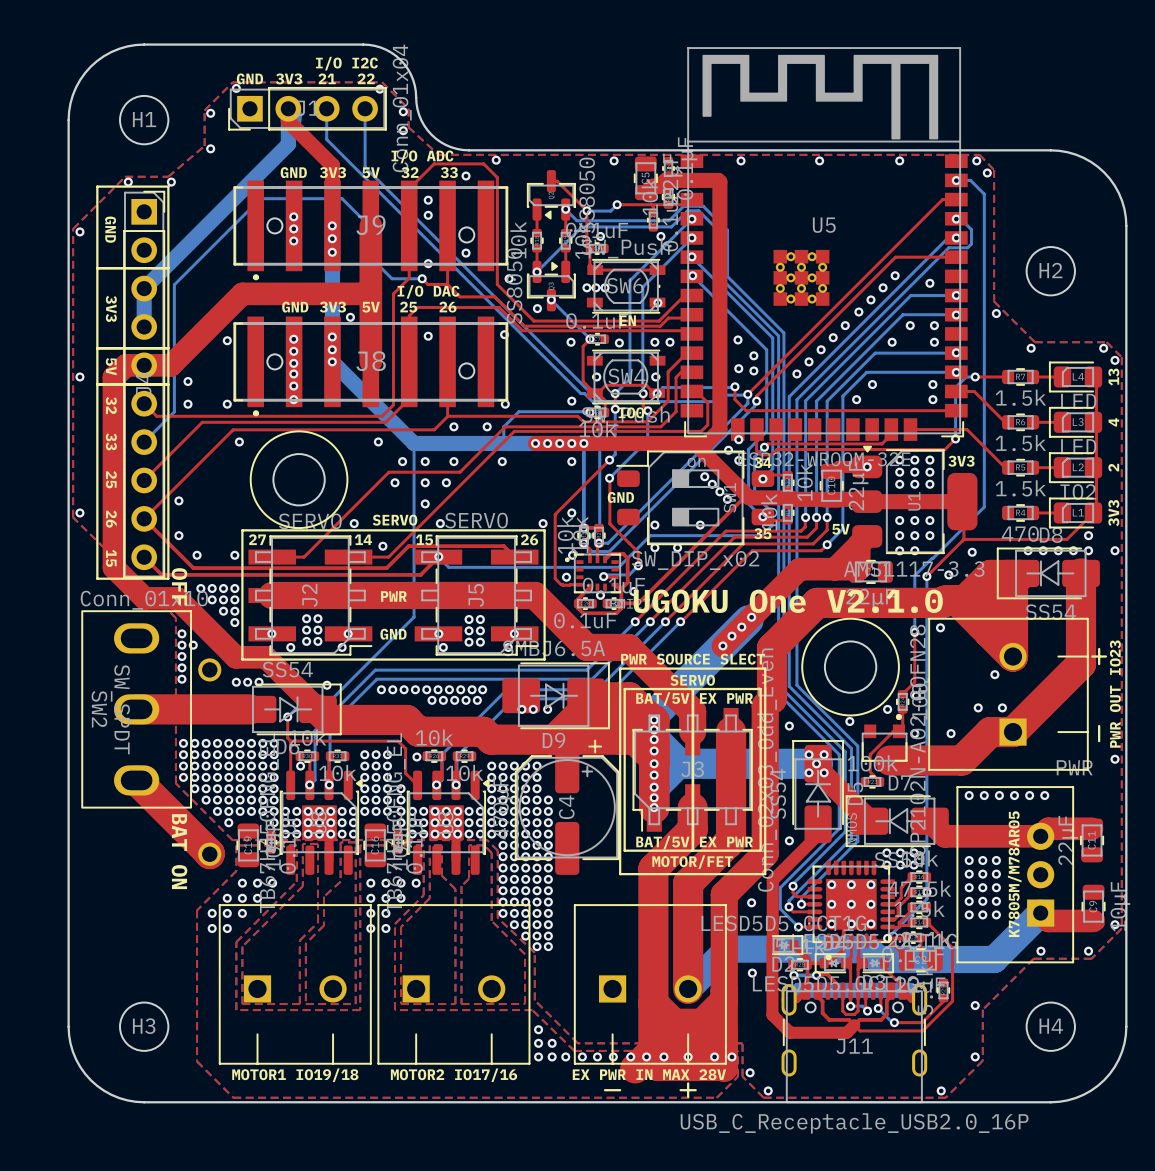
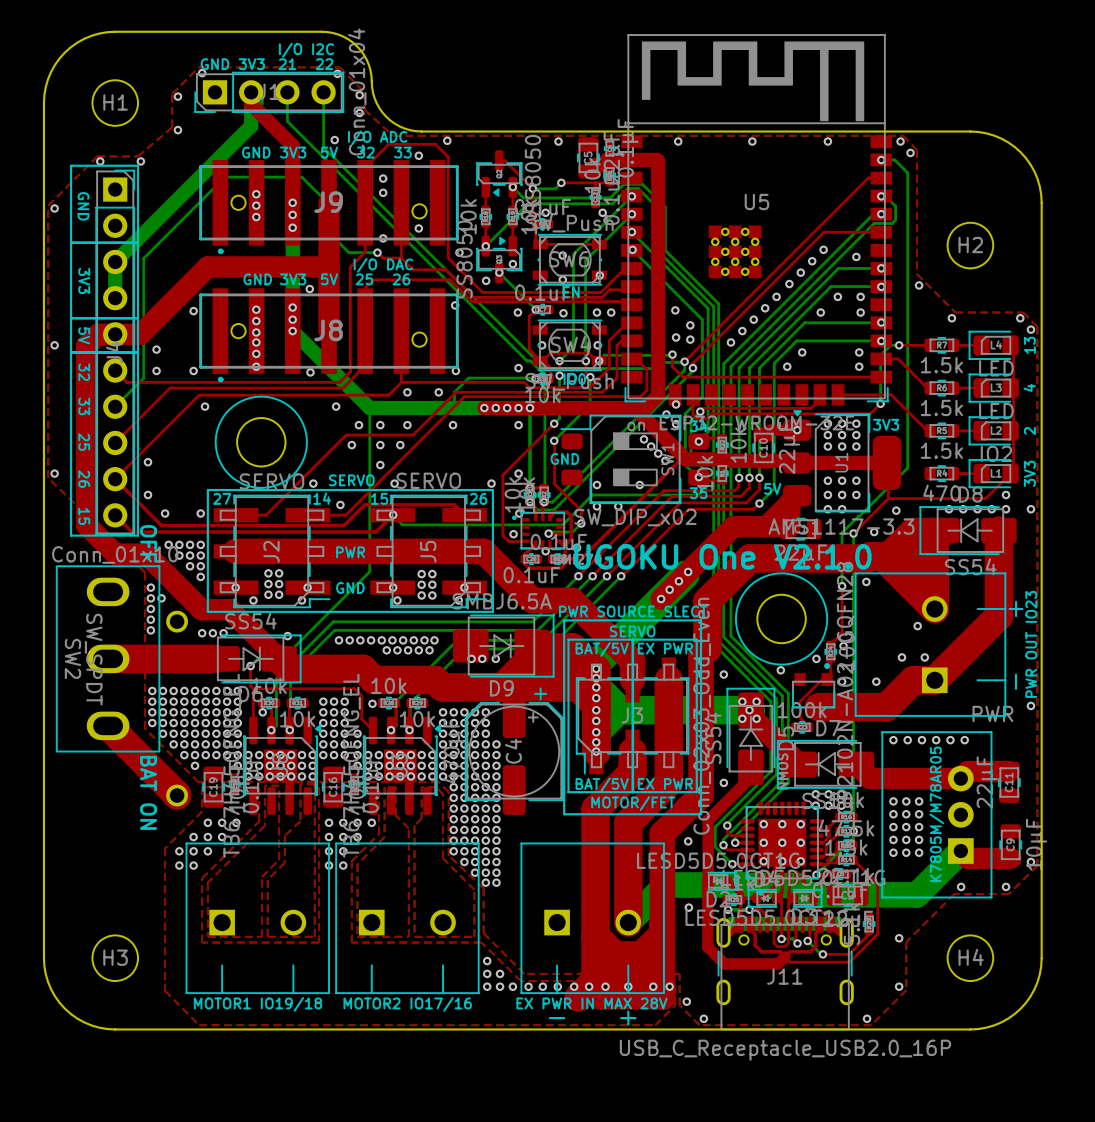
via: none -> (334, 140)
via: none -> (562, 255)
via: (586, 287) -> none
via: (595, 287) -> none
via: (605, 287) -> none
via: none -> (512, 264)
via: none -> (562, 279)
via: (428, 336) -> none
via: none -> (310, 372)

